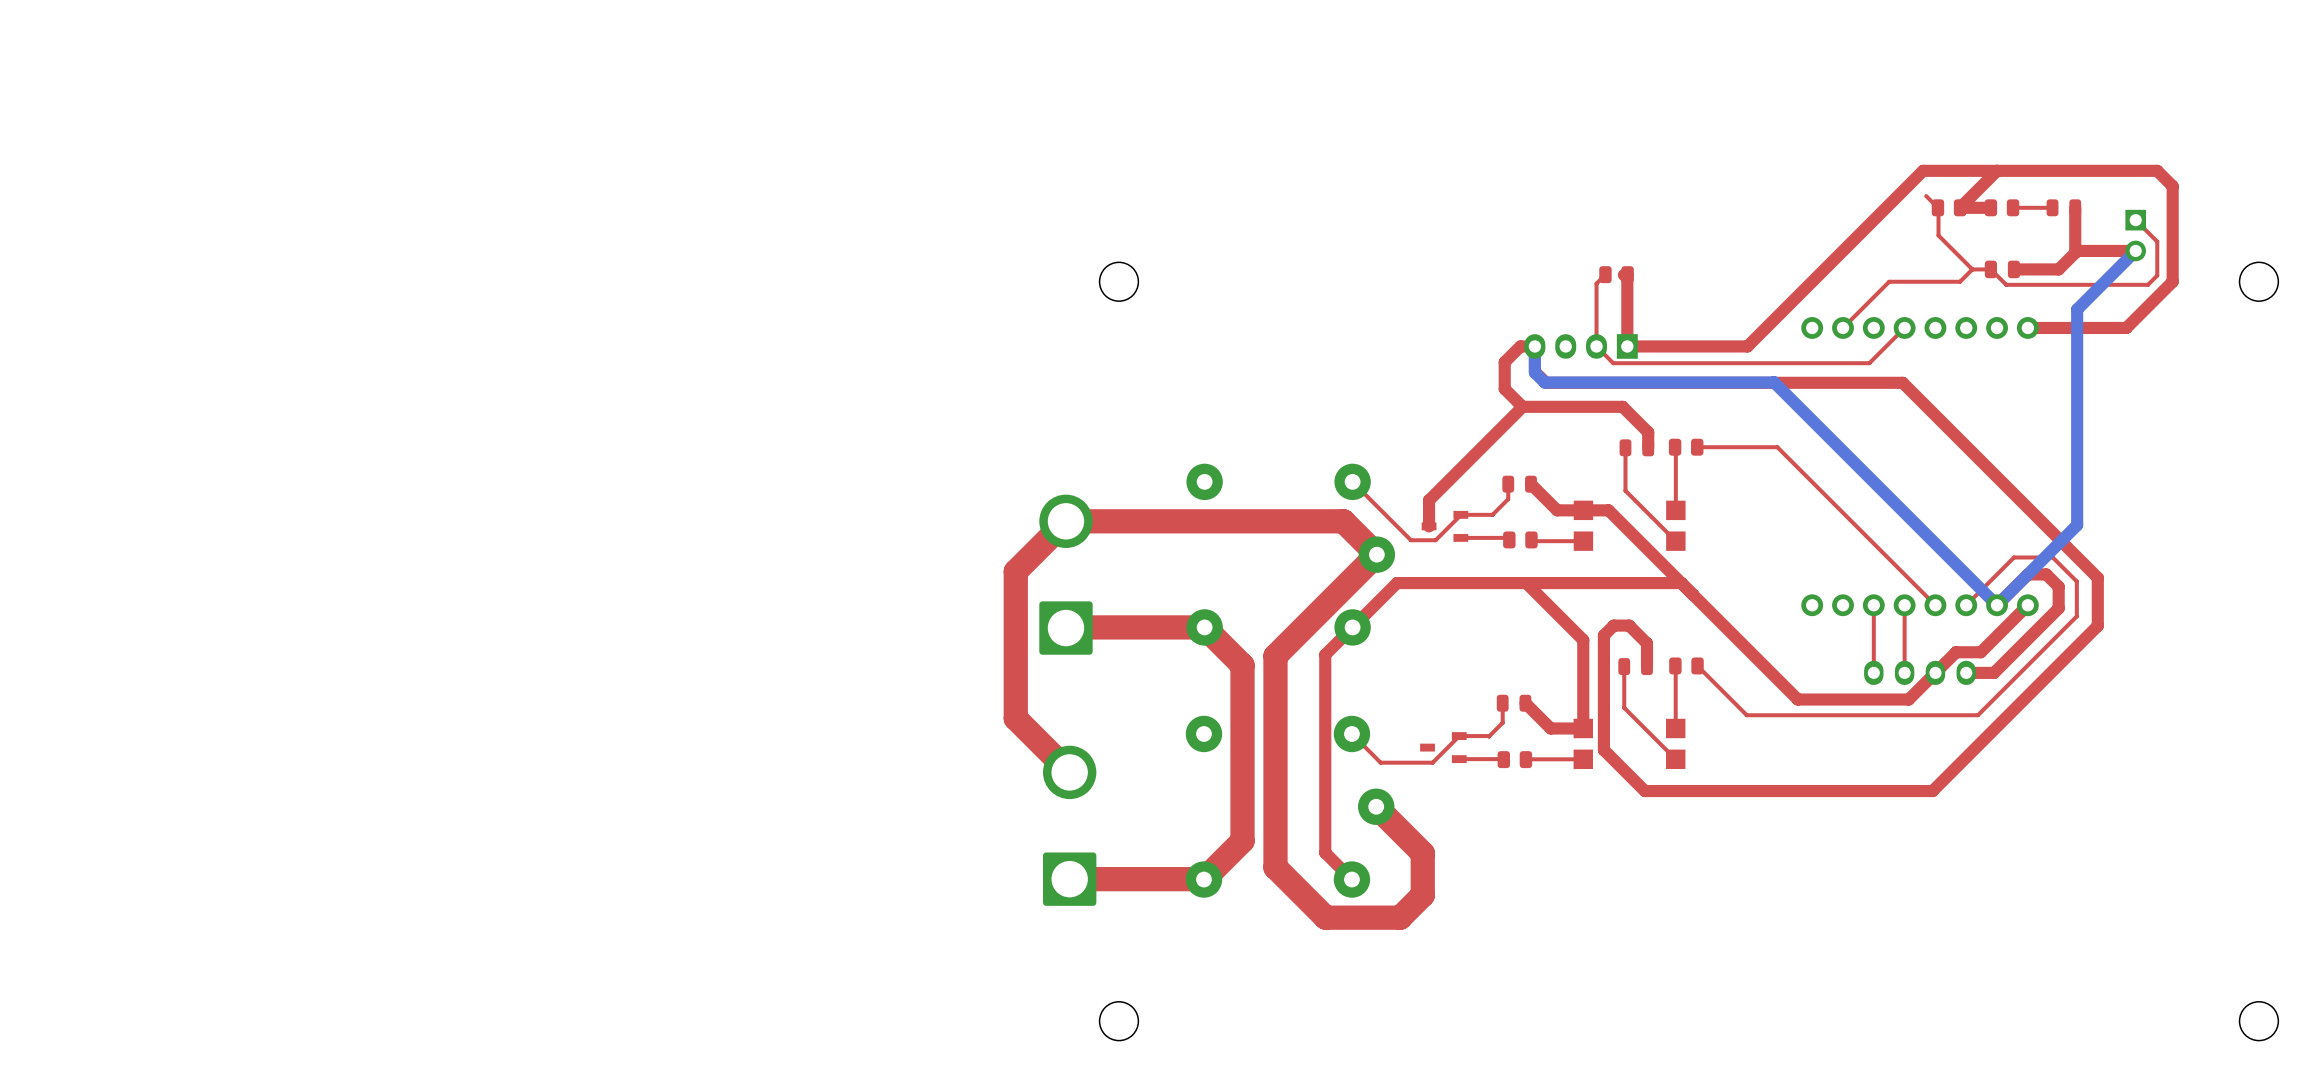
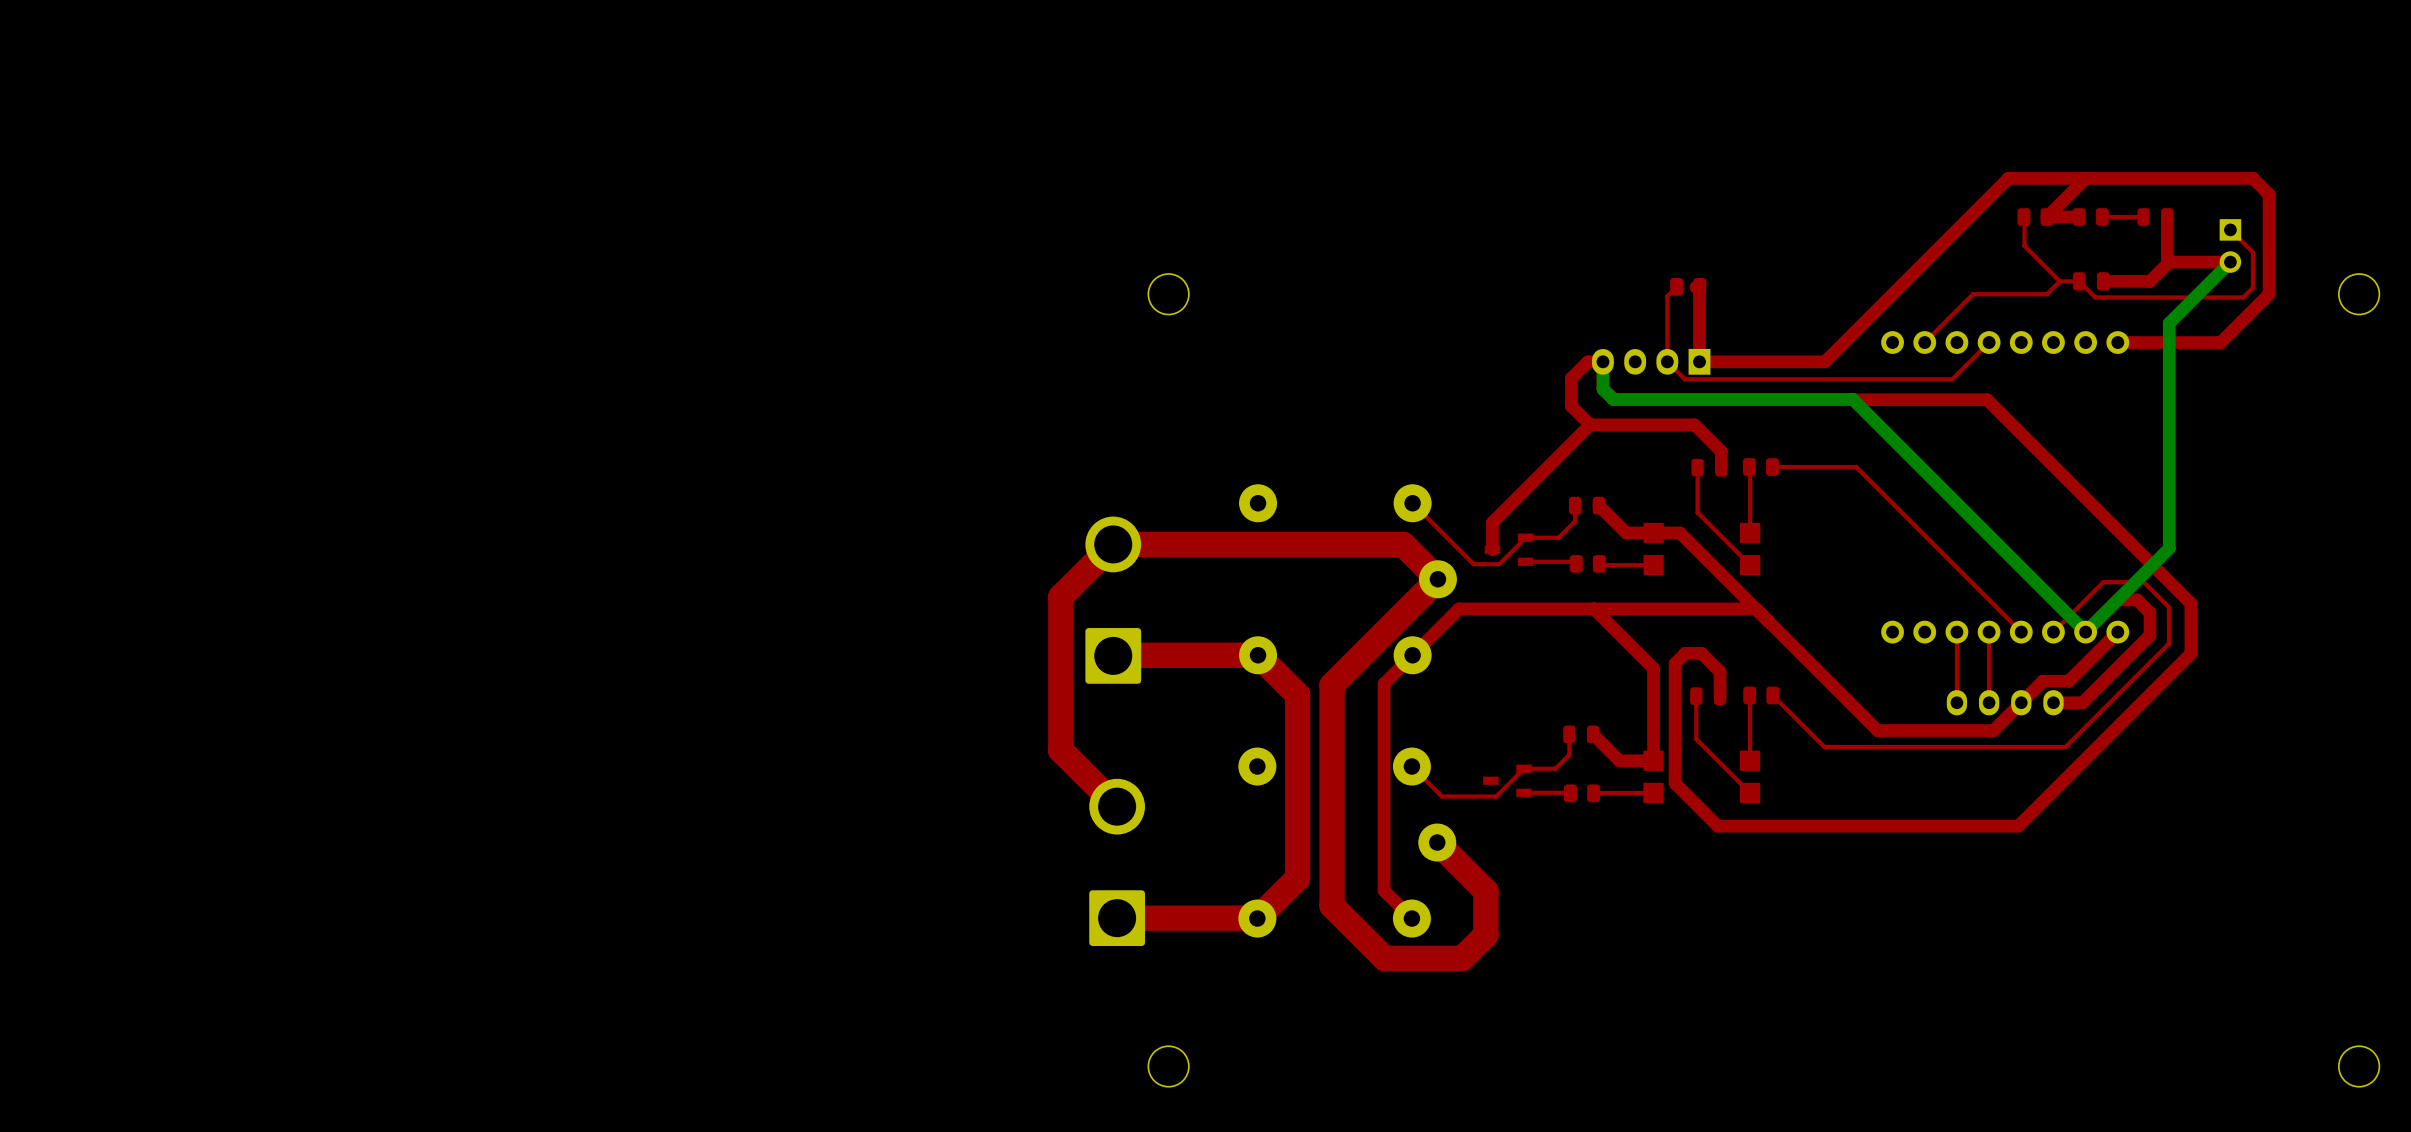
top track: (1926, 196) (1937, 207) -> none

